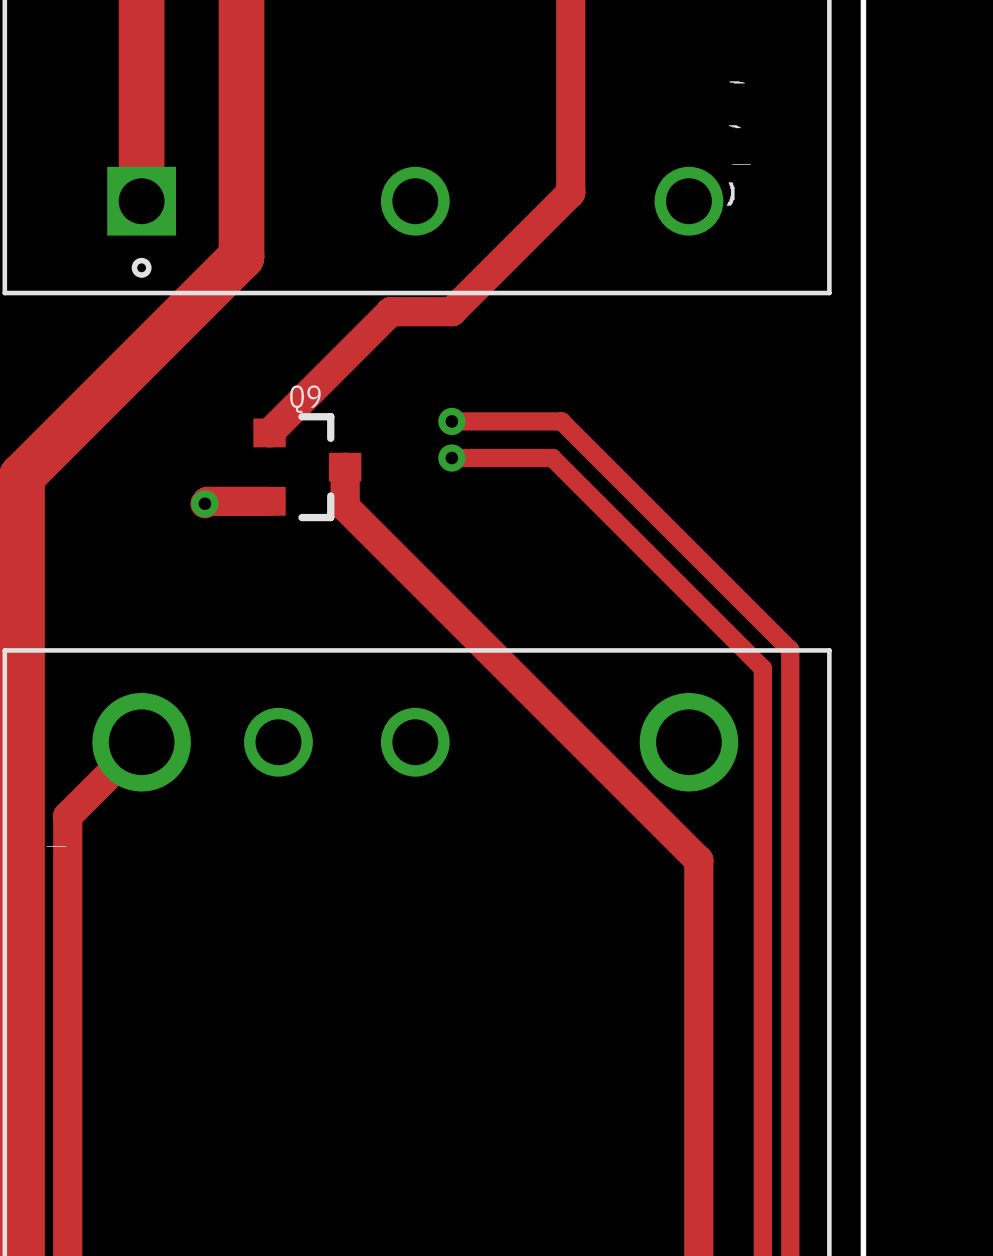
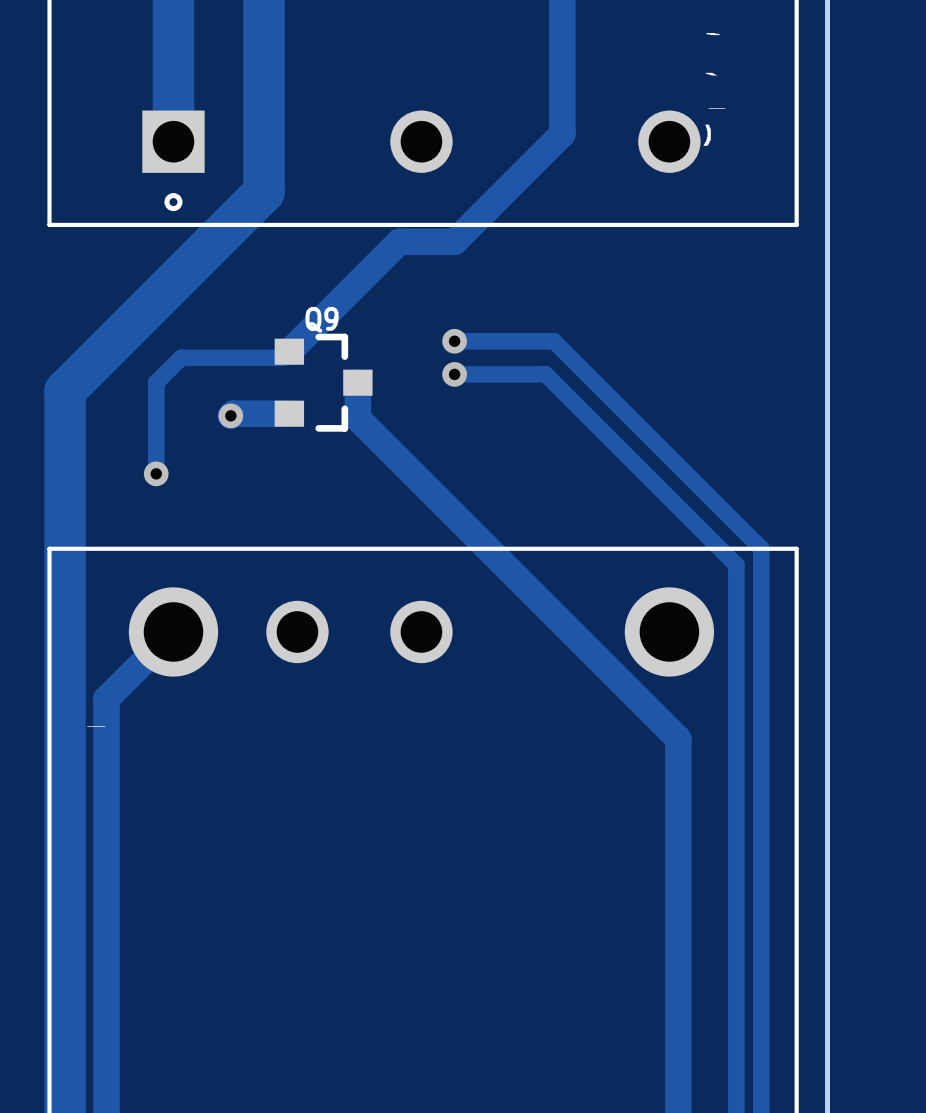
track: none -> (289, 351) (283, 357) (181, 357) (156, 382) (156, 473)
via: none -> (156, 473)

